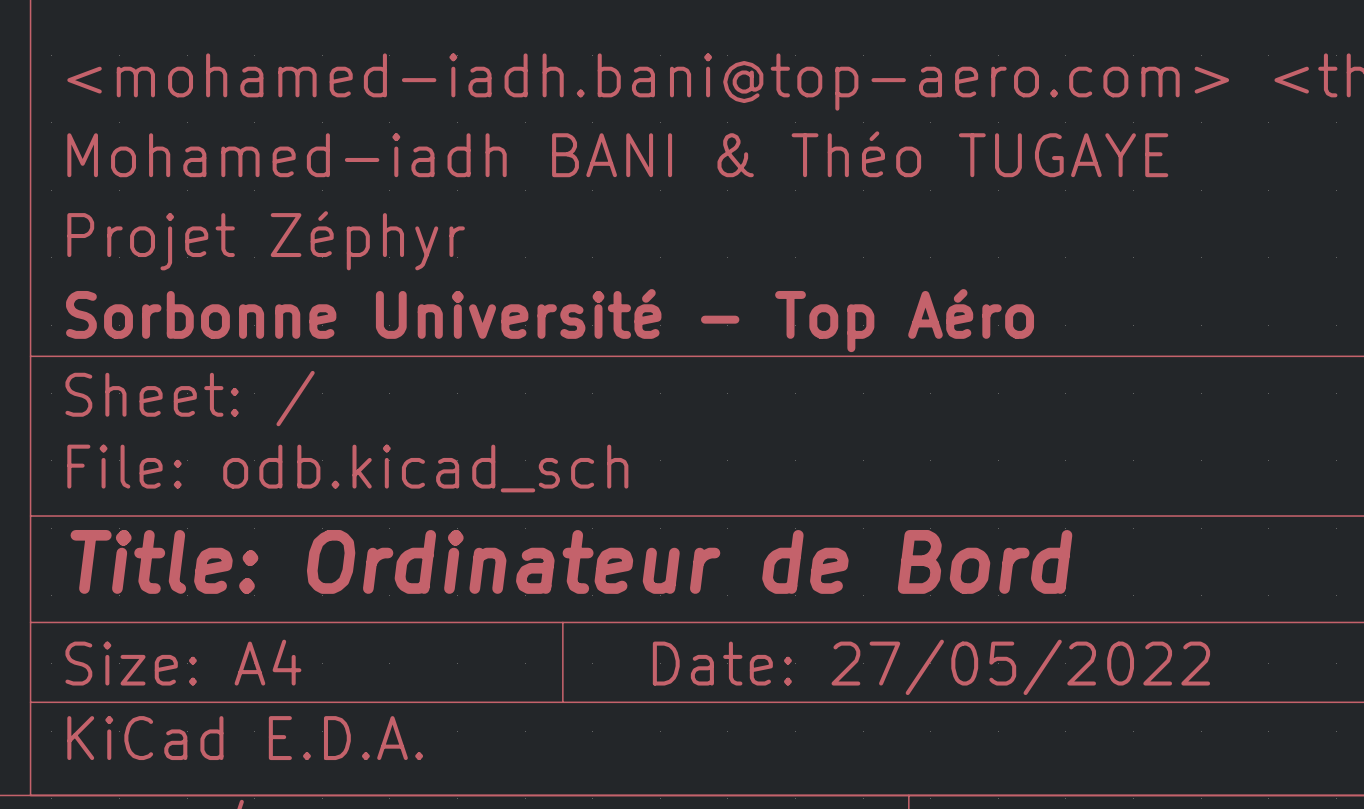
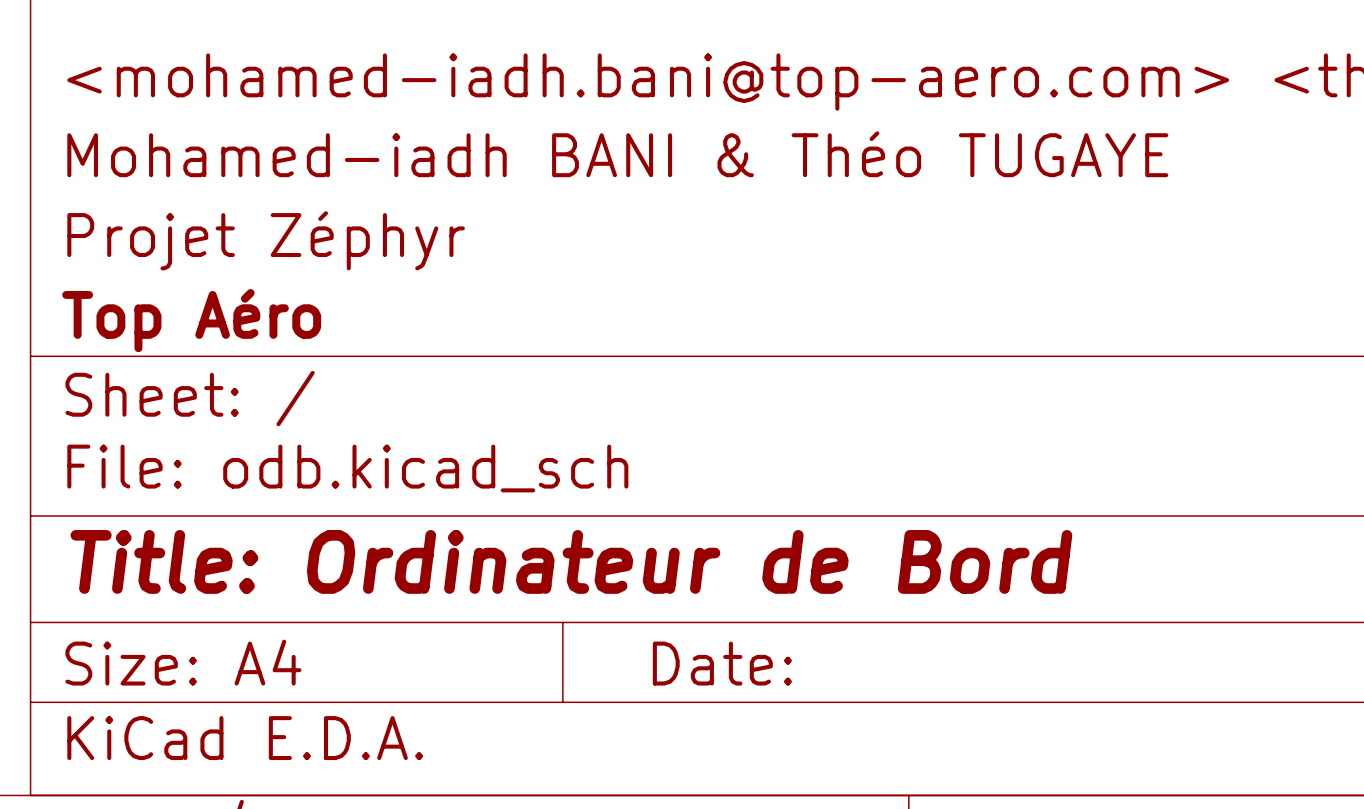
title block: Sorbonne Université - Top Aéro (550, 320) -> Top Aéro (191, 320)
title block: Date: 27/05/2022 (931, 667) -> Date: (722, 663)

